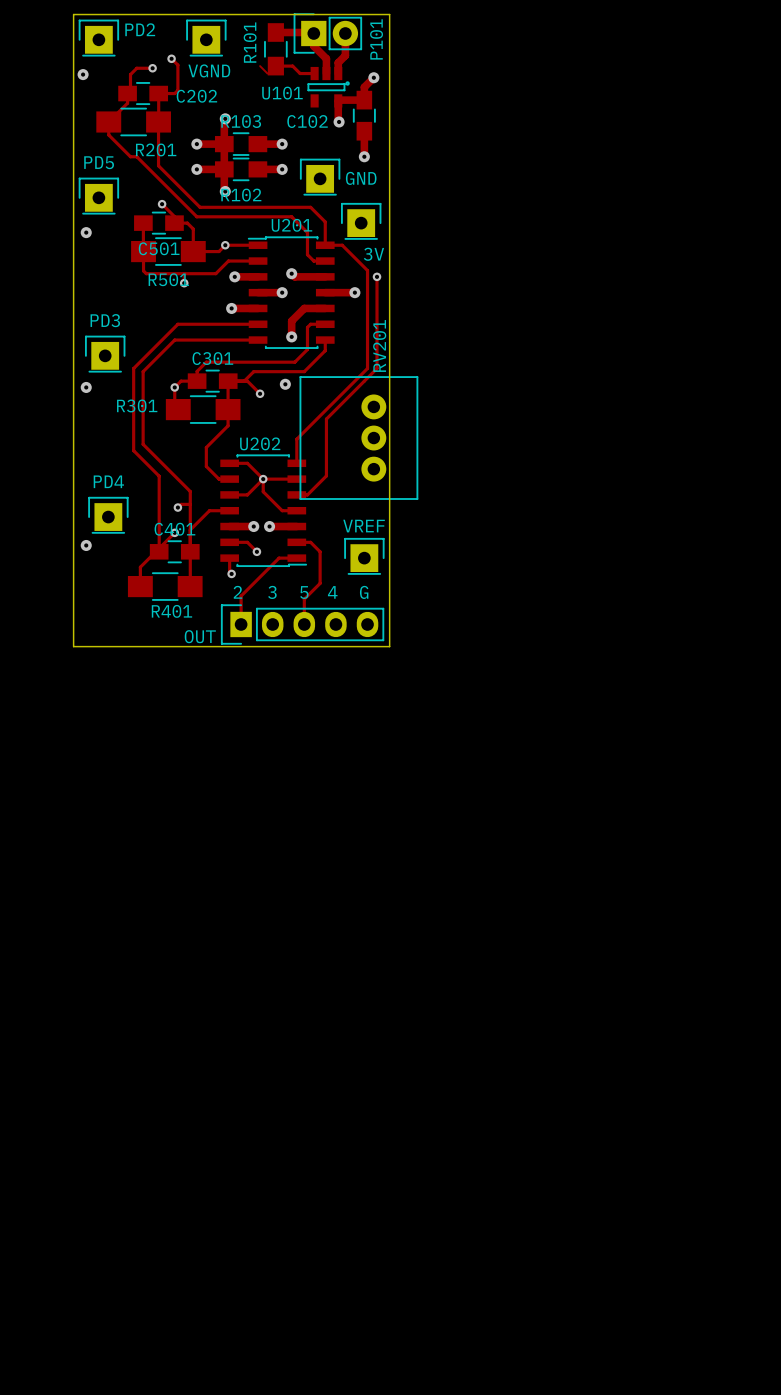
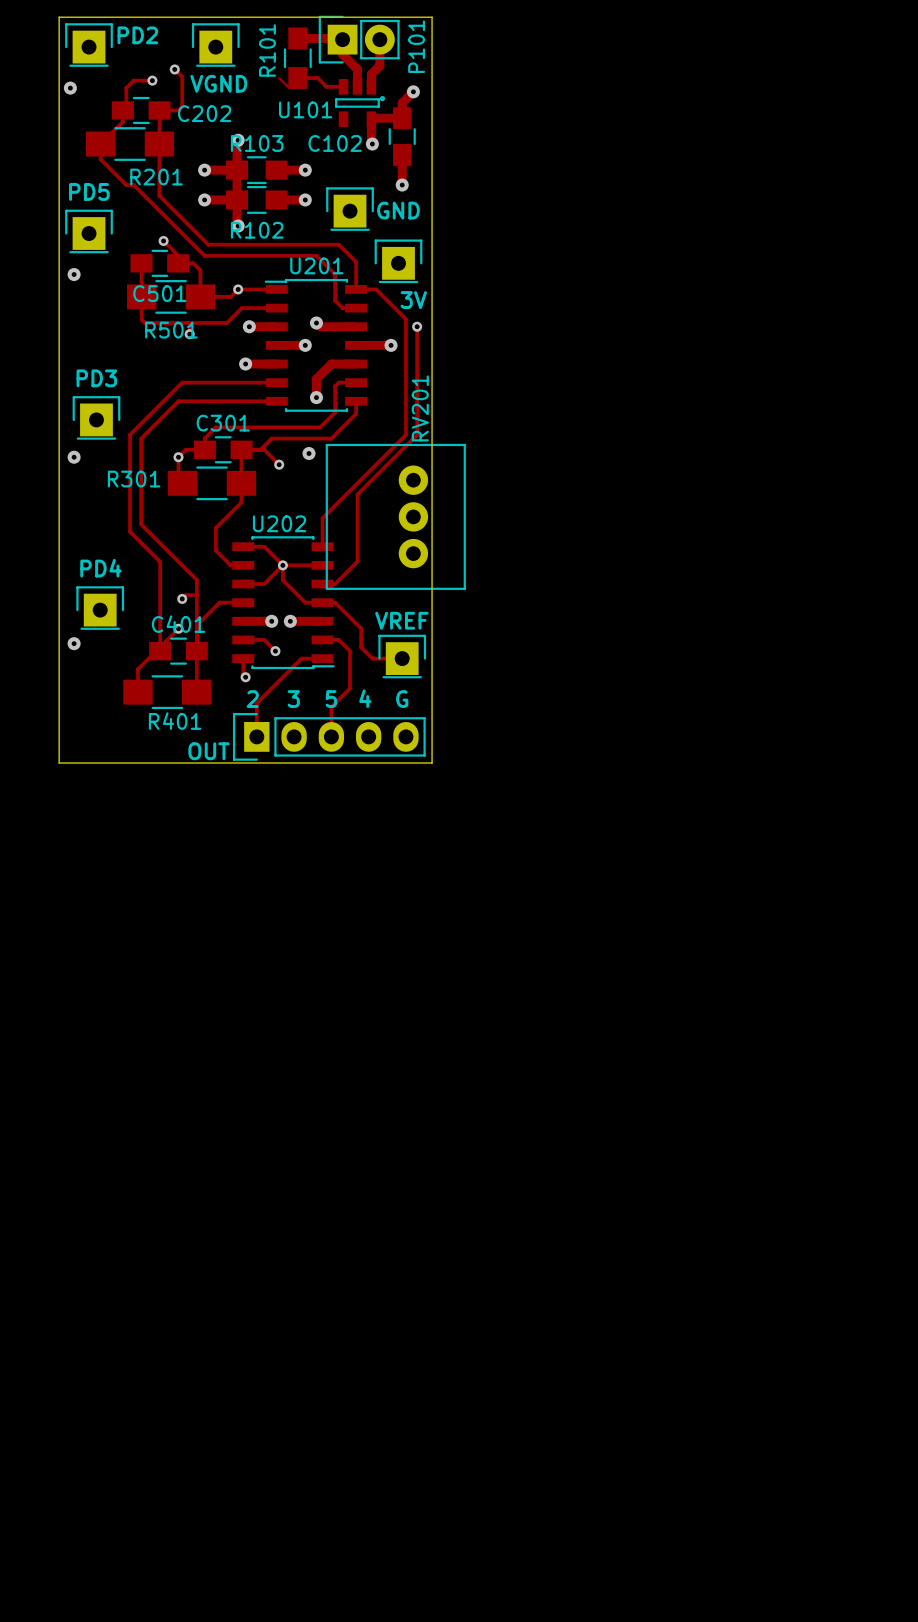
track: none -> (322, 602) (335, 602) (361, 628) (361, 647) (372, 658) (402, 658)

